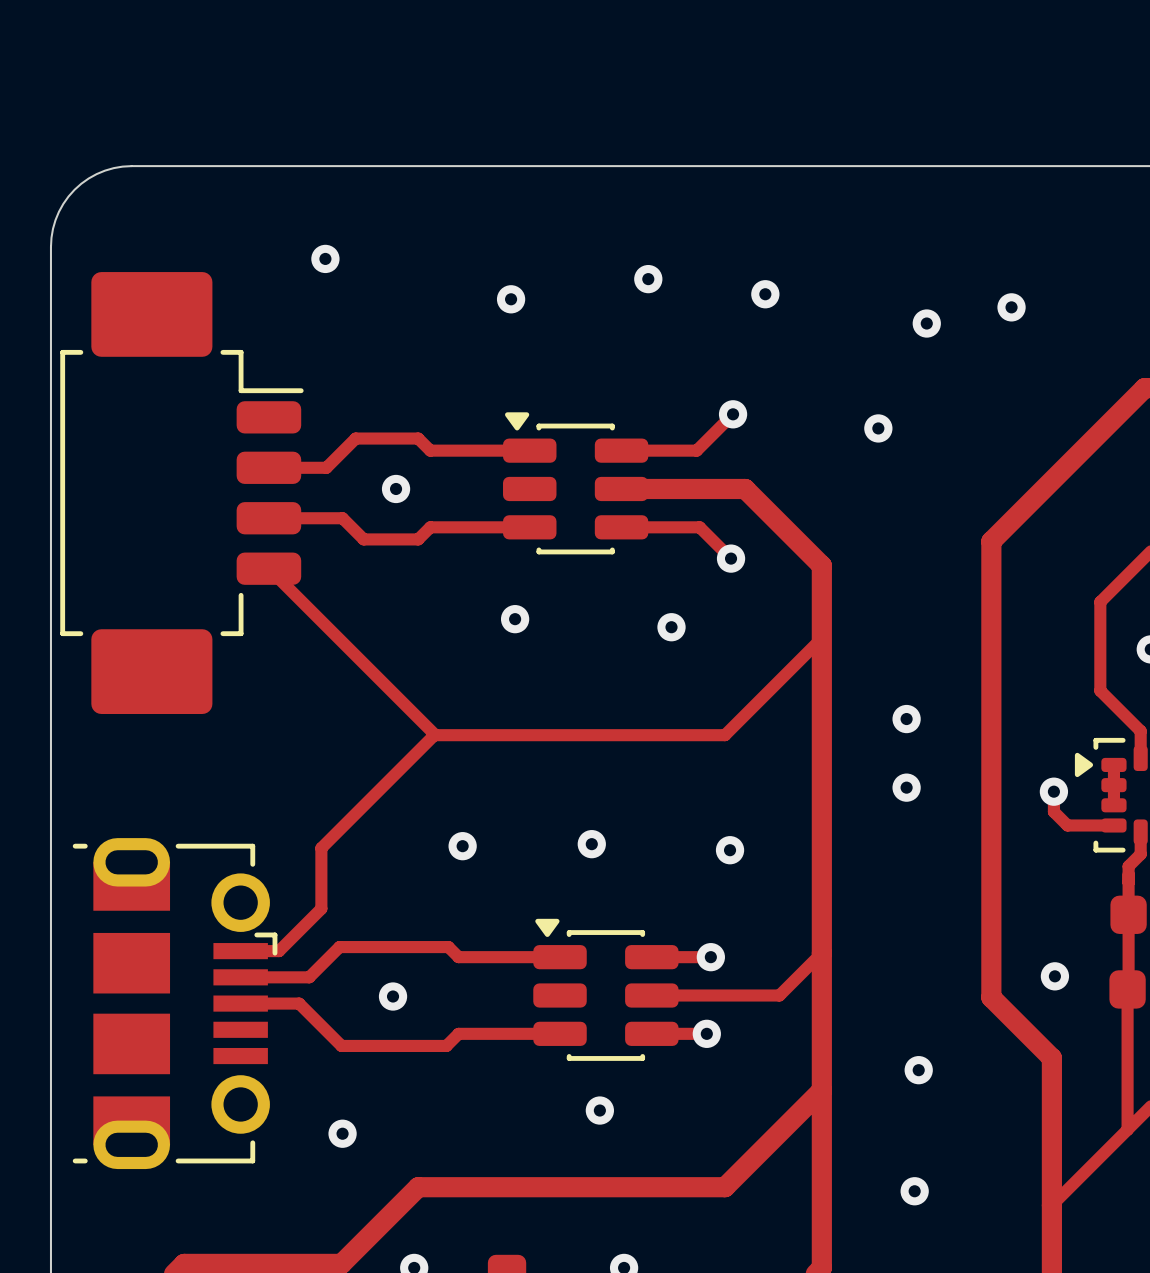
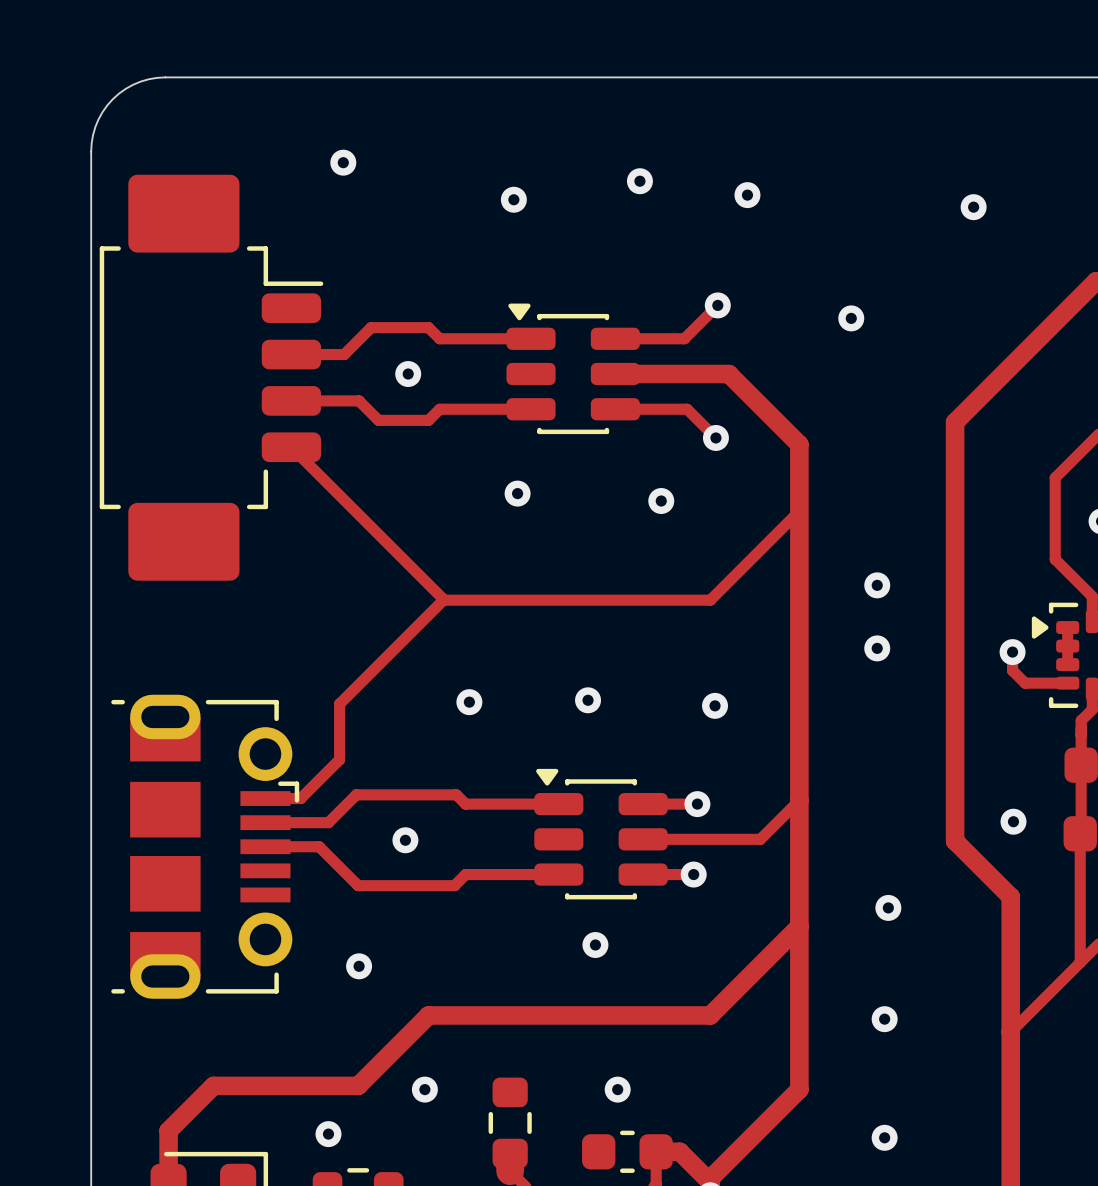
via: (926, 323) -> none

